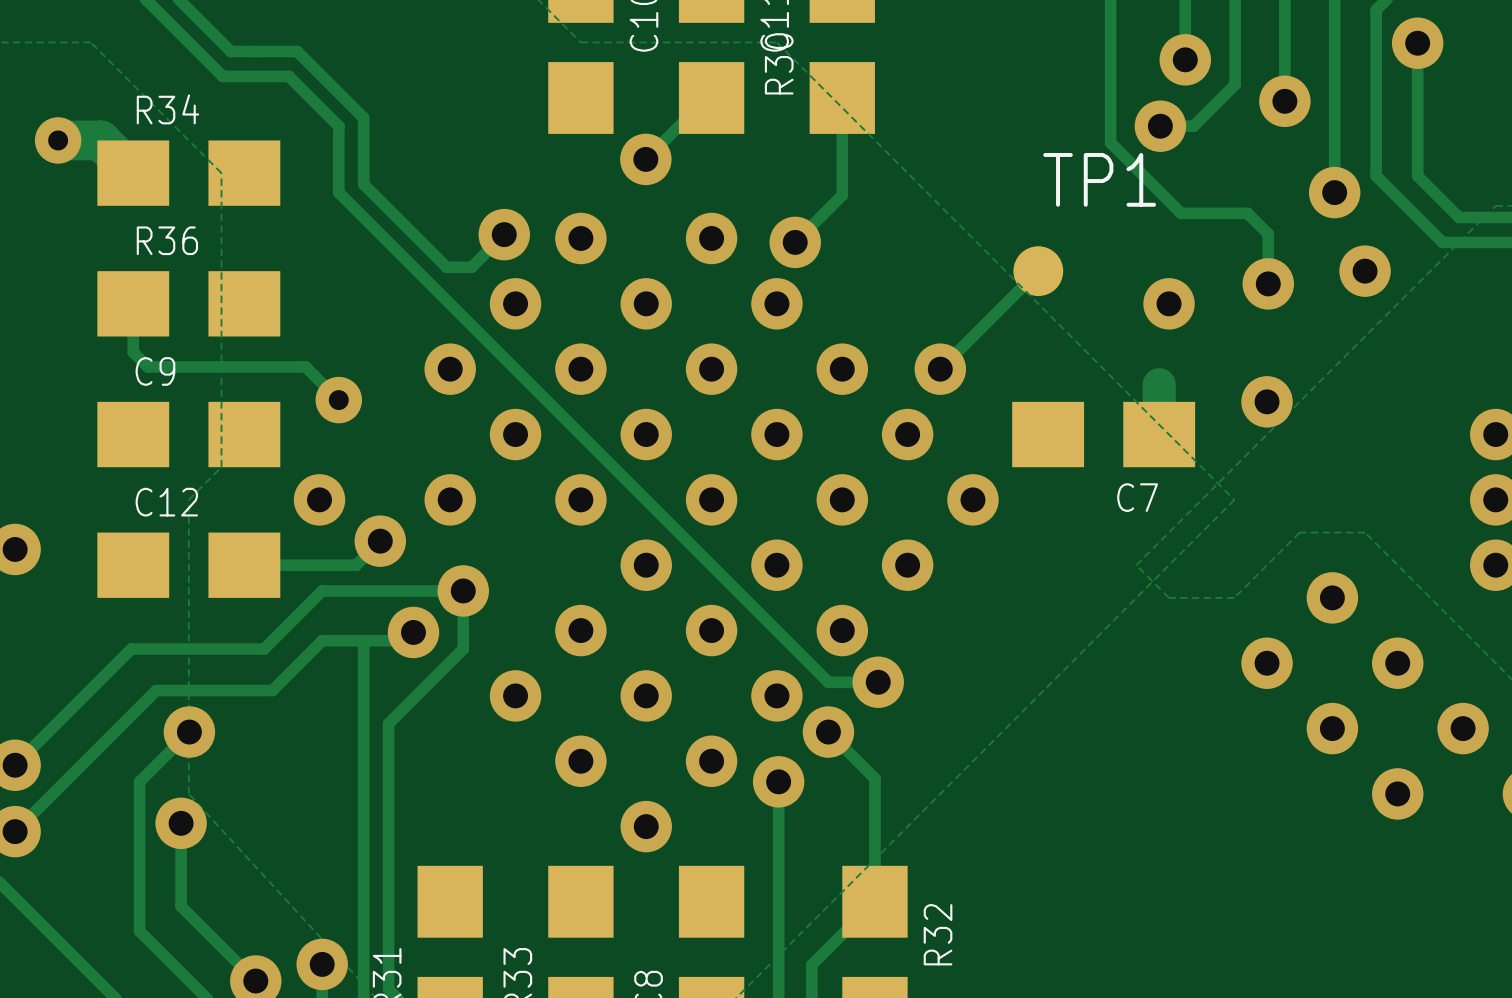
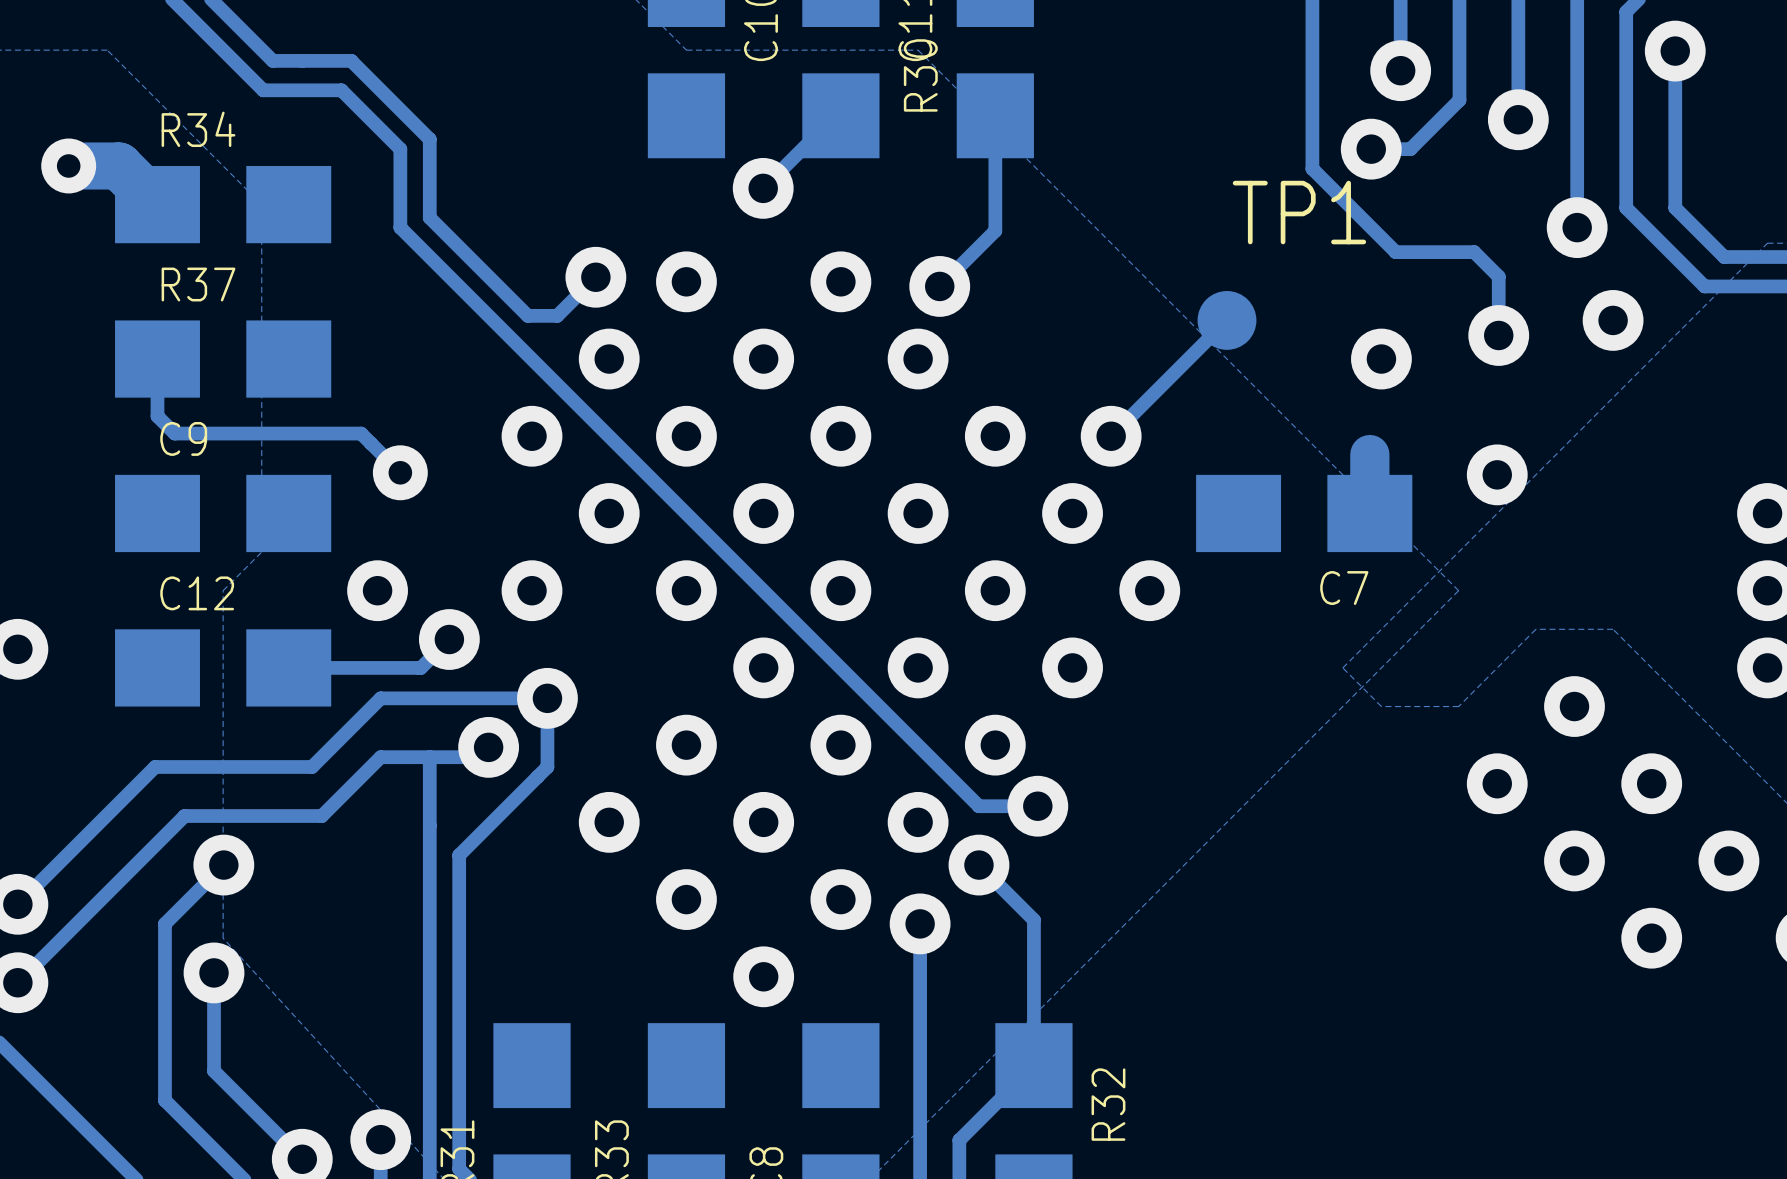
R36 name: R36 (167, 240) -> R37 (198, 284)

